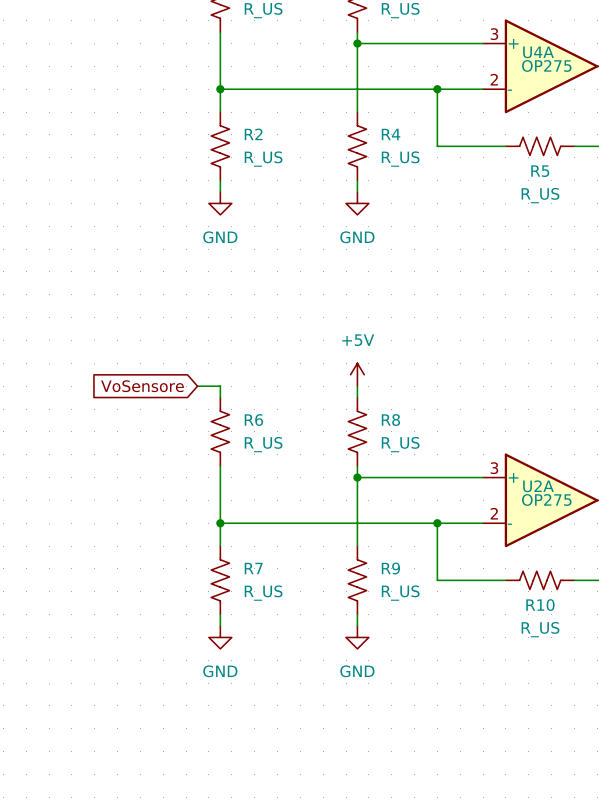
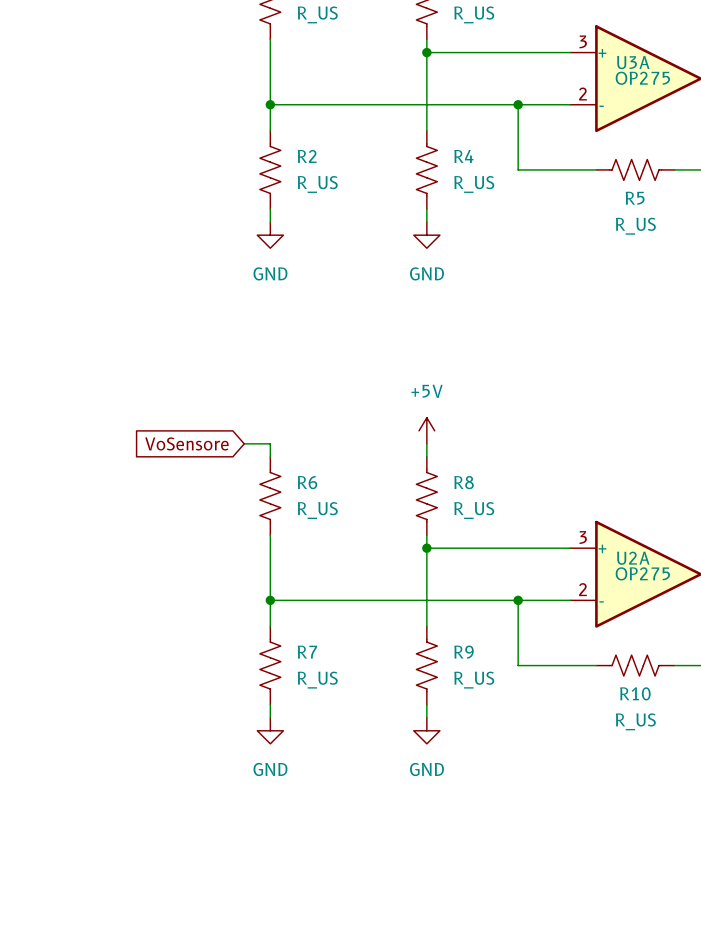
U4A name: U4A (538, 52) -> U3A (633, 62)

